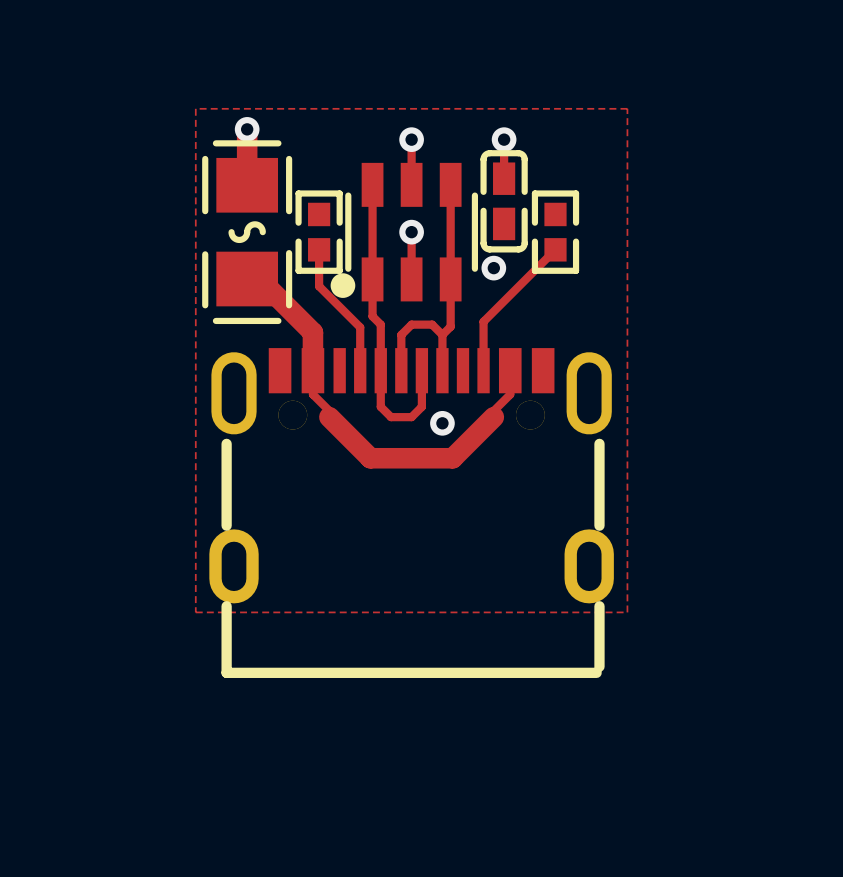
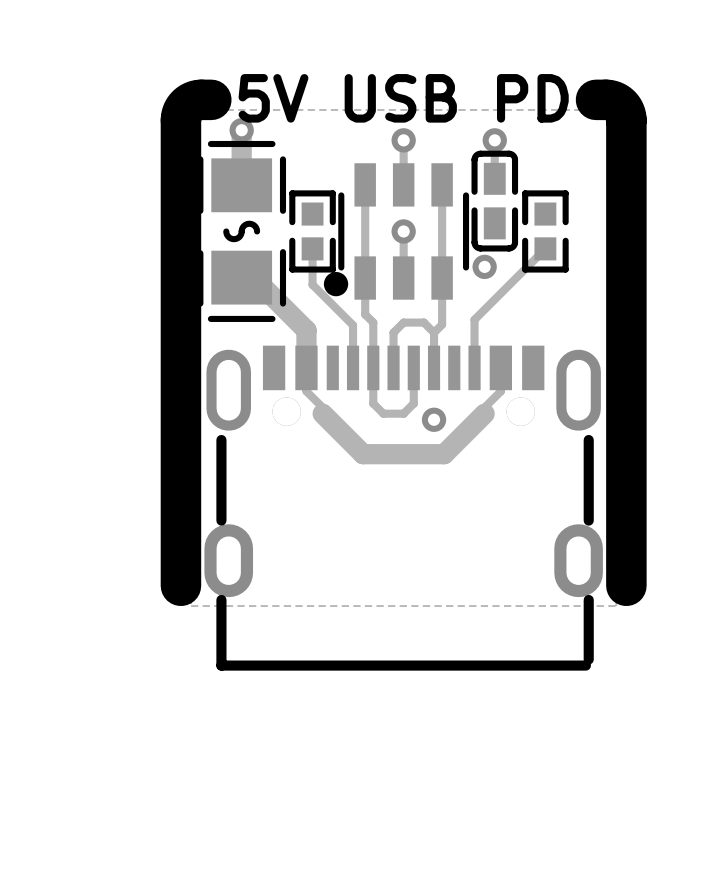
text: none -> 5V USB PD (403, 98)
line: none -> (211, 99) (198, 100) (191, 102) (183, 109) (180, 120) (180, 585)
line: none -> (596, 99) (608, 100) (616, 102) (623, 109) (626, 120) (626, 585)

